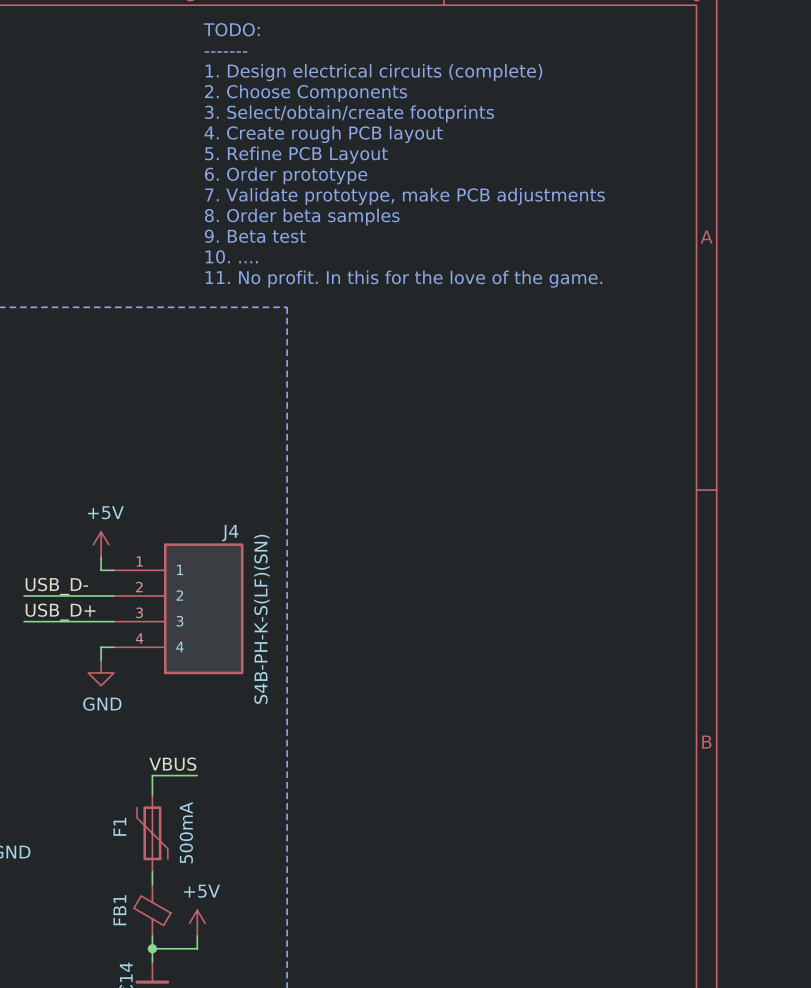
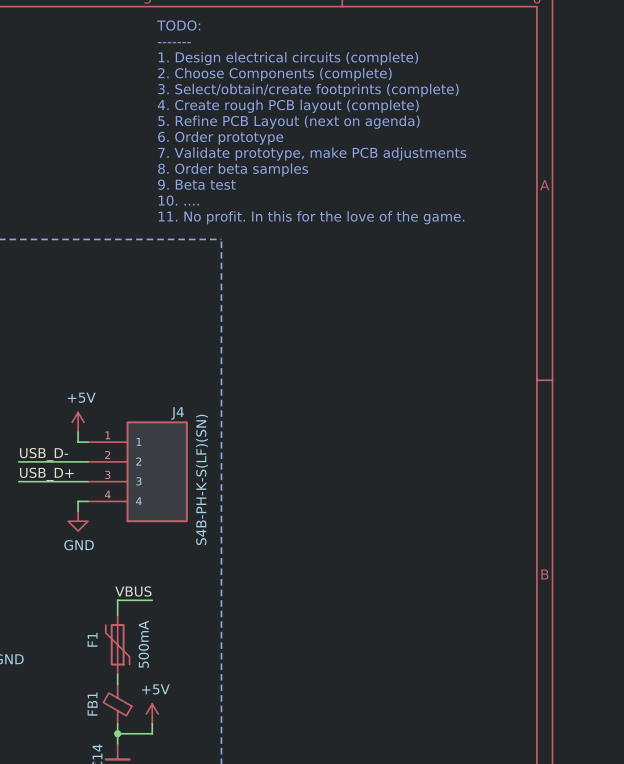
text: 2. Choose Components (306, 93) -> 2. Choose Components (complete) (274, 74)
text: 3. Select/obtain/create footprints (349, 113) -> 3. Select/obtain/create footprints (complete) (308, 90)
text: 4. Create rough PCB layout (323, 134) -> 4. Create rough PCB layout (complete) (288, 106)
text: 5. Refine PCB Layout (296, 155) -> 5. Refine PCB Layout (next on agenda) (288, 122)

